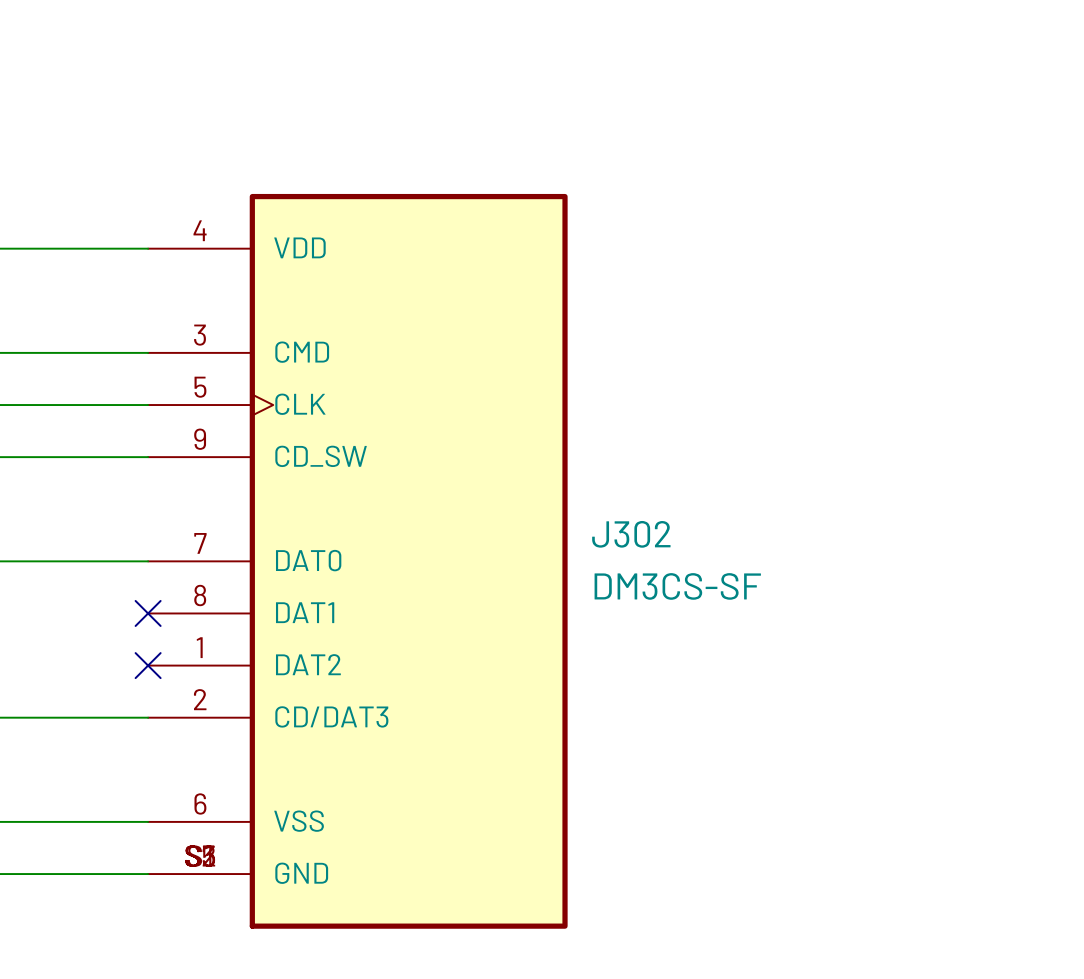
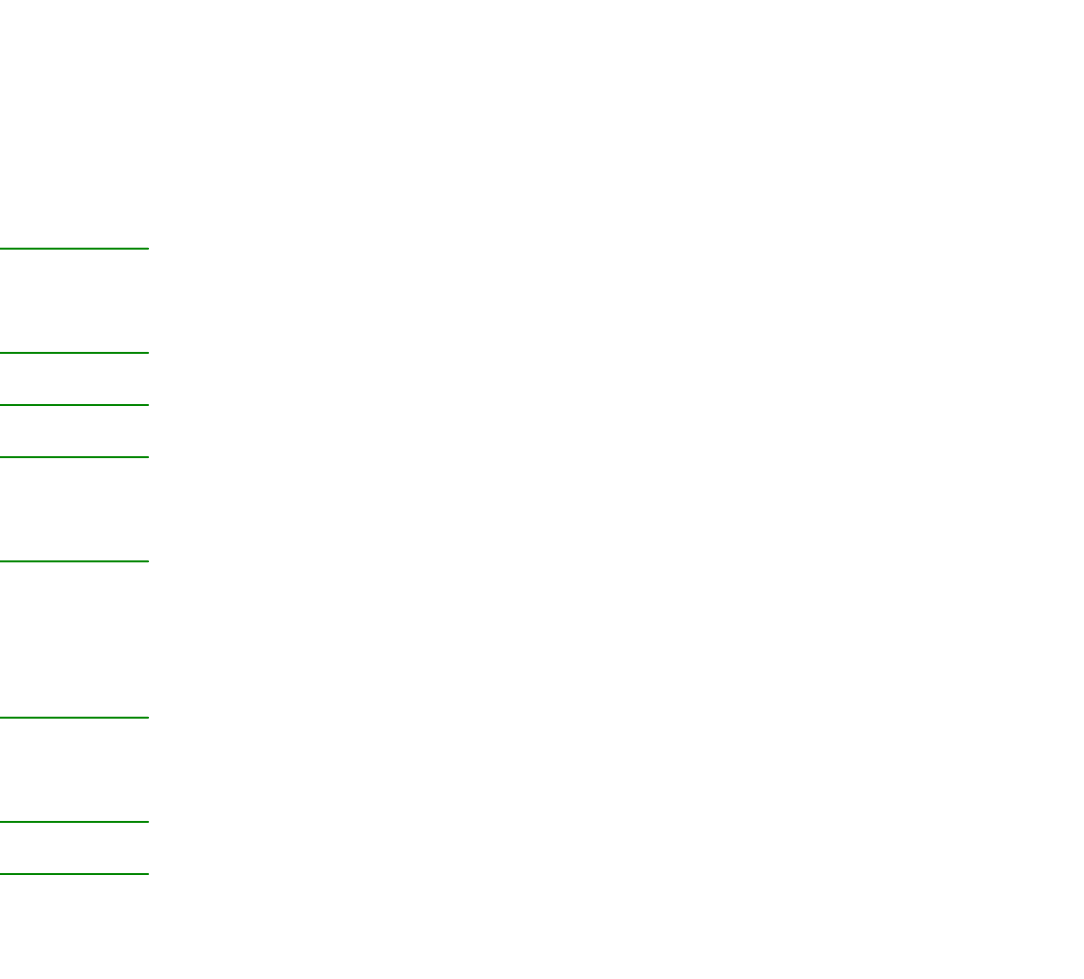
J302: DM3CS-SF (357, 561) -> none
no-connect mark: (148, 613) -> none
no-connect mark: (148, 665) -> none

